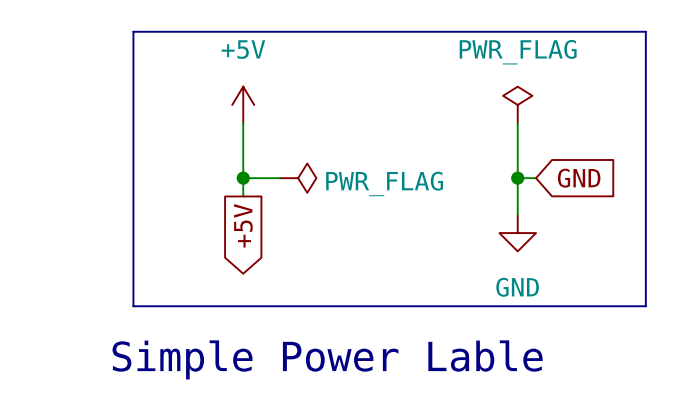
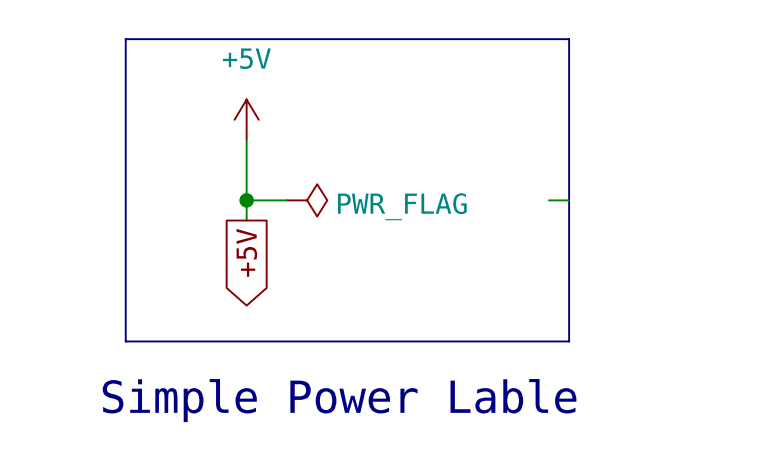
line: (536, 31) (645, 31) (645, 306) (536, 306) -> (569, 39) (569, 341)
power symbol: PWR_FLAG (517, 104) -> none
wire: (517, 123) (517, 214) -> none
junction: (517, 178) -> none
global label: GND (579, 178) -> none
power symbol: GND (517, 233) -> none

